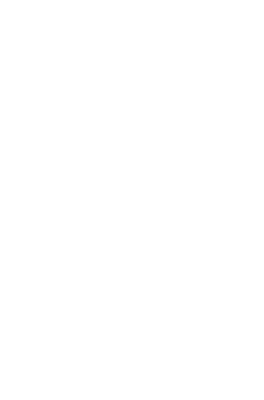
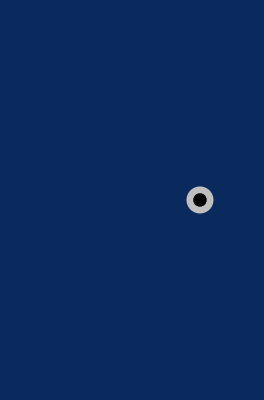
via: none -> (199, 199)

